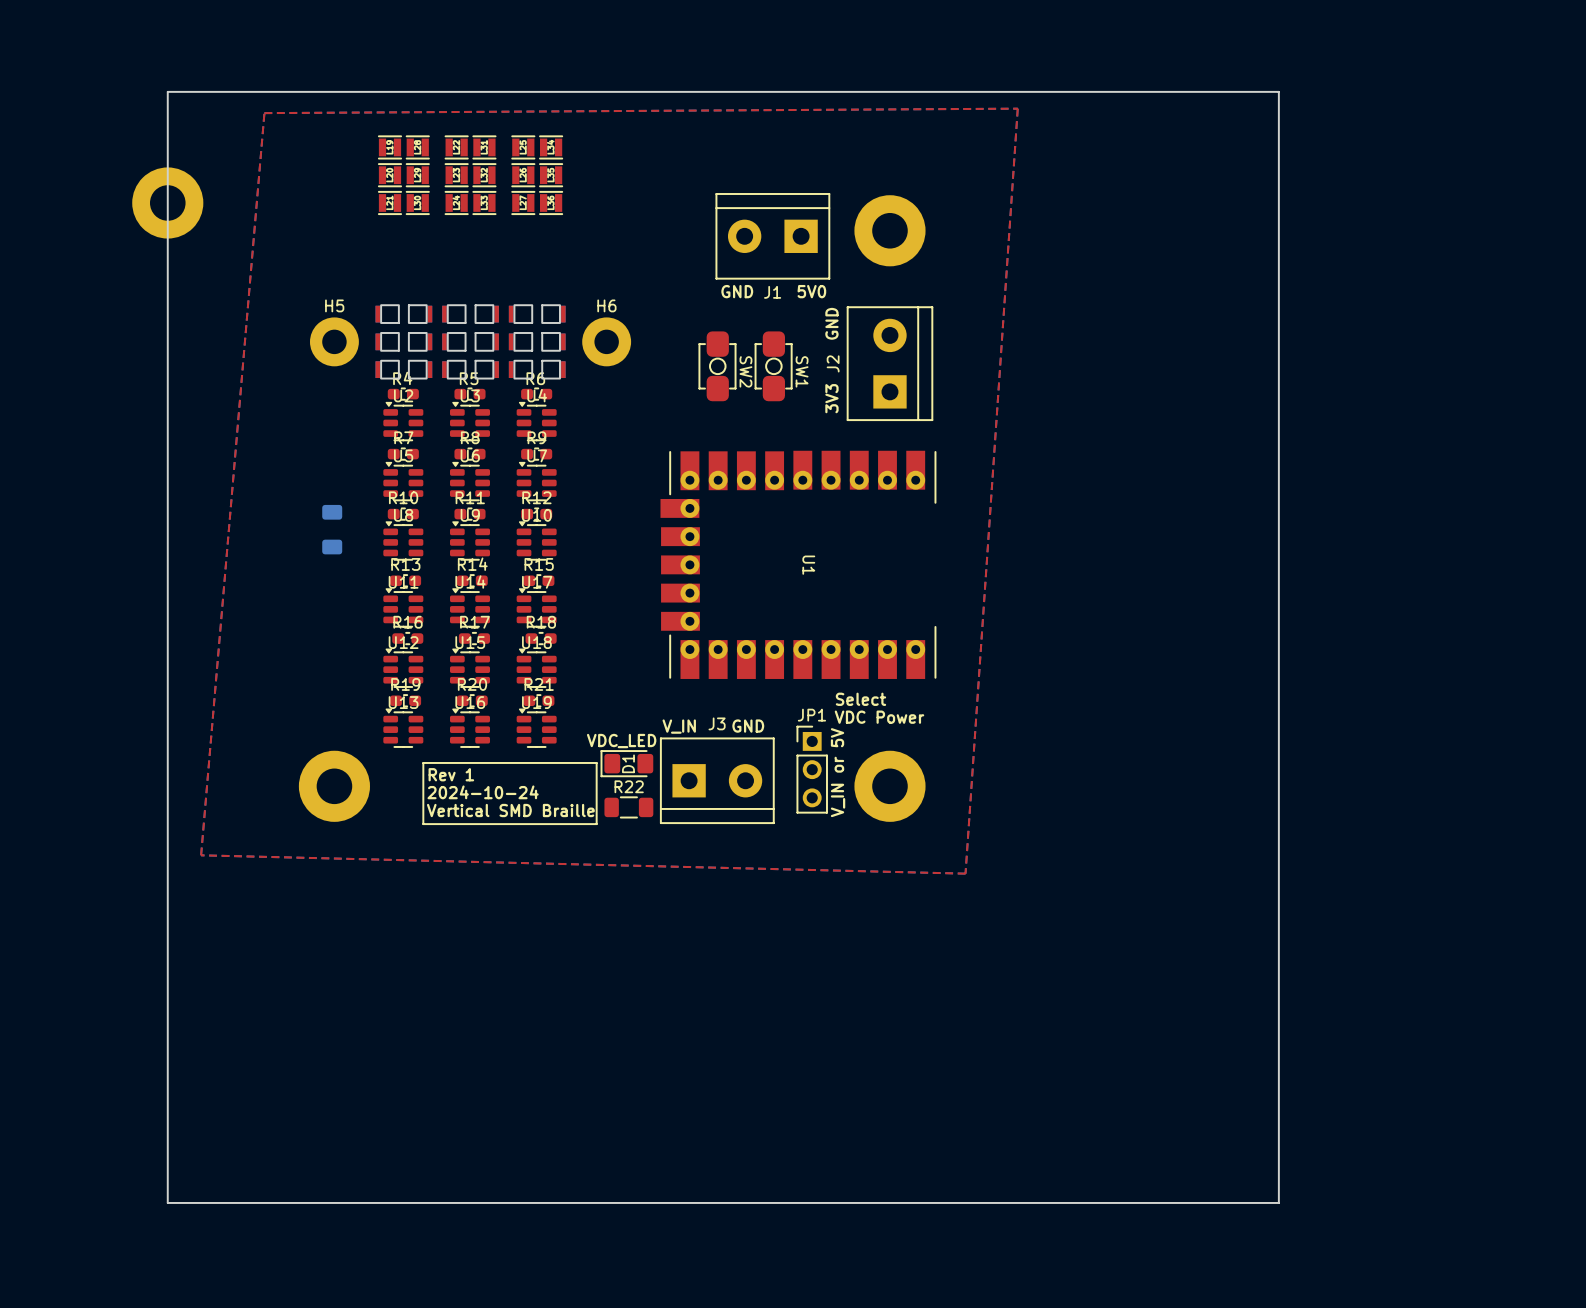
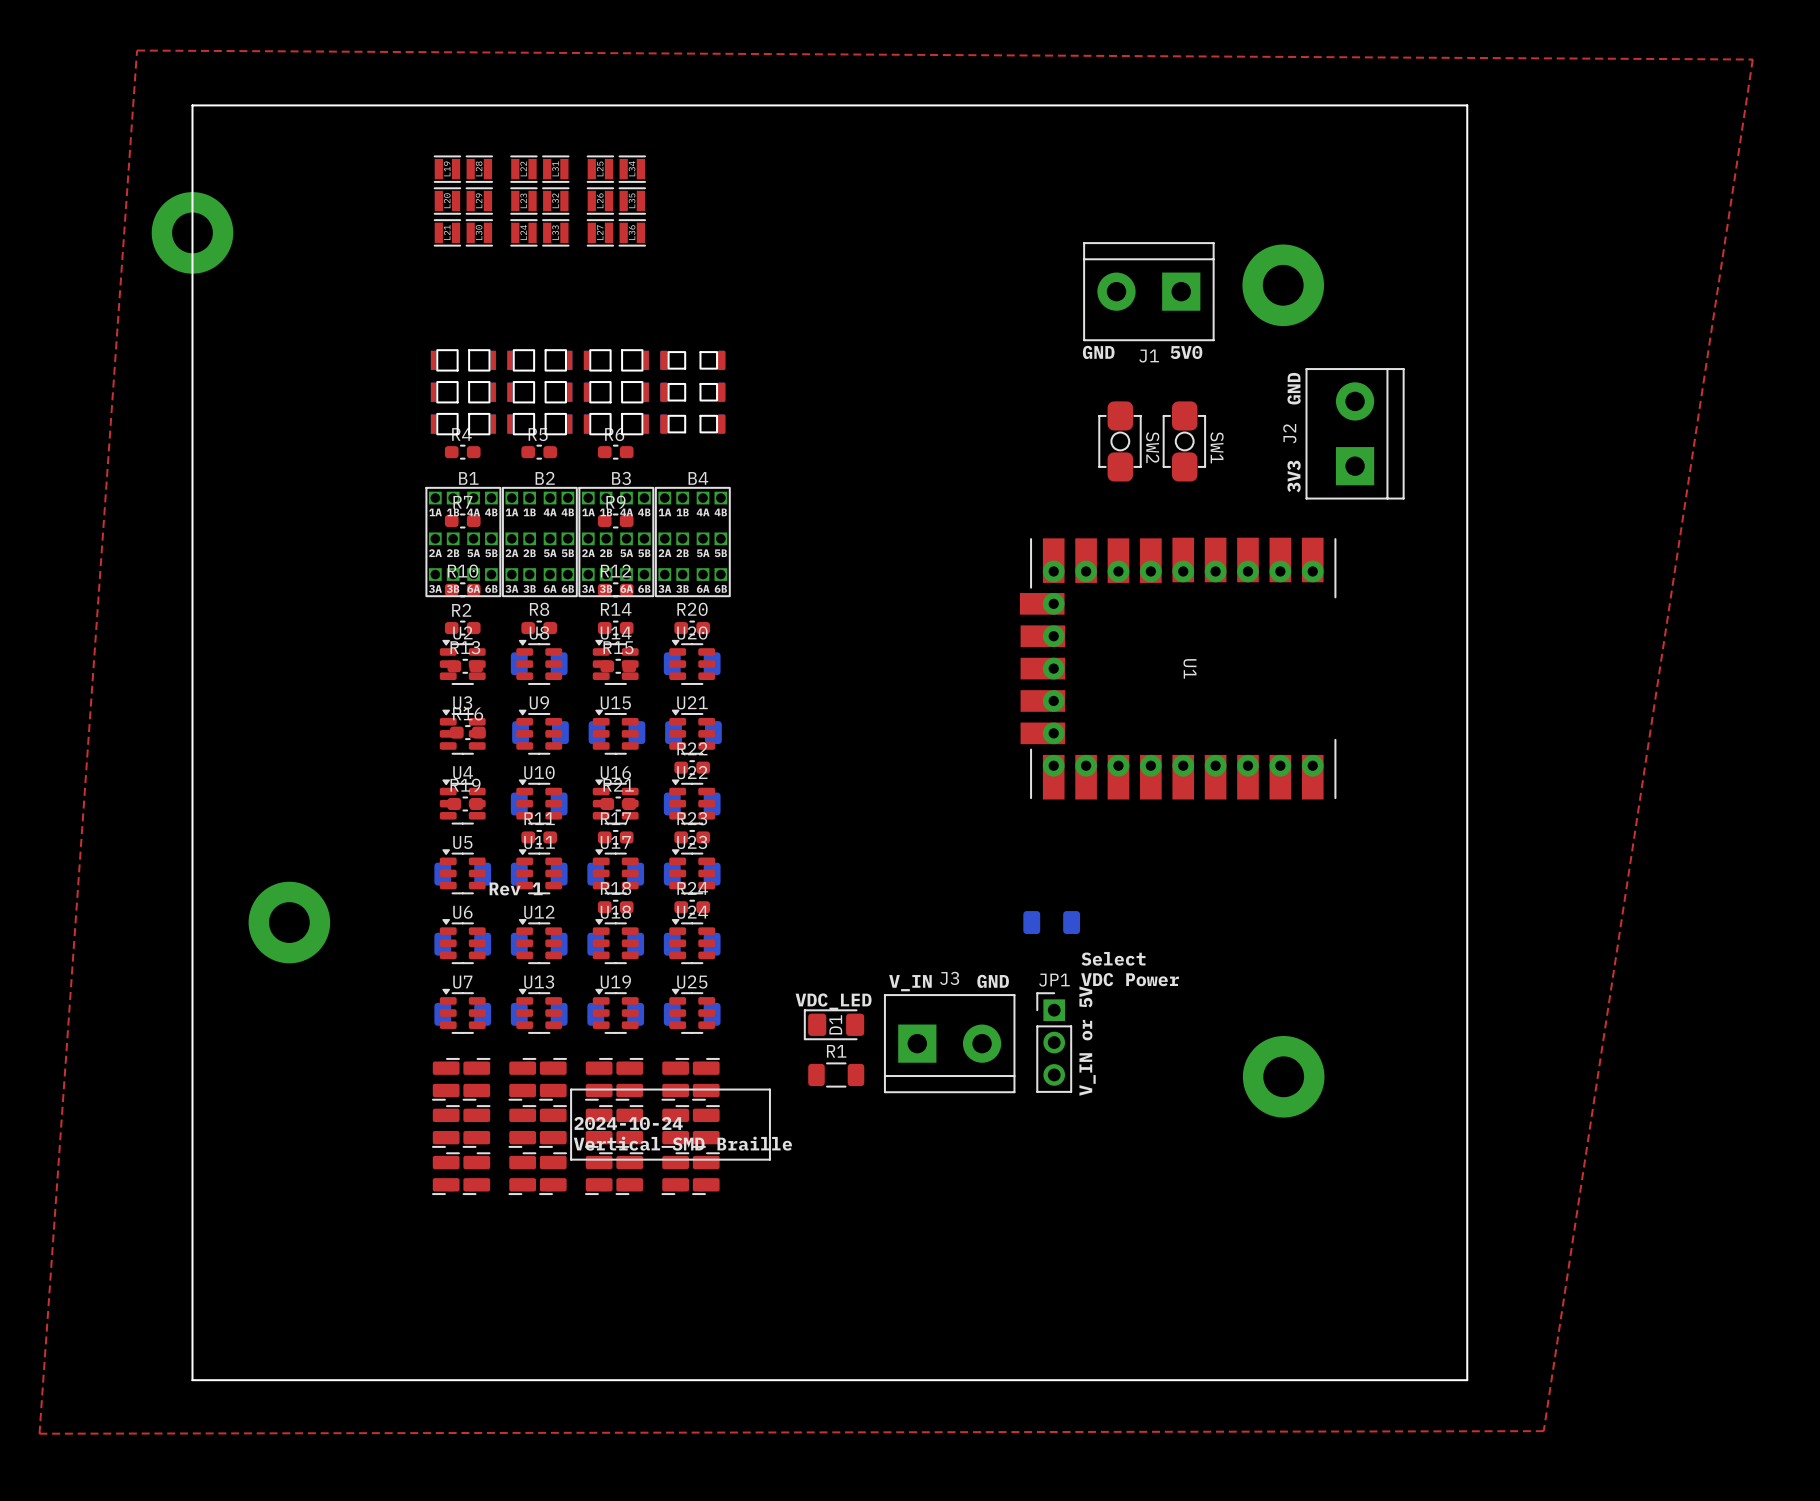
top zone outline: none -> (137, 50) (1752, 59) (1543, 1431) (39, 1433) (137, 50)
top zone outline: (1017, 108) (264, 113) (201, 855) (965, 873) (1017, 108) -> none
part position: (889, 230) -> (1283, 285)
J1 position: (772, 236) -> (1148, 291)
text position: GND 5V0 (773, 291) -> GND 5V0 (1142, 352)
part: none -> (672, 360)
part: none -> (712, 360)
H5: (334, 341) -> none
part: none -> (672, 392)
H6: (606, 341) -> none
part: none -> (712, 392)
text: 3V3 GND (831, 360) -> none
J2 position: (889, 363) -> (1355, 433)
SW2 position: (717, 366) -> (1120, 441)
SW1 position: (773, 366) -> (1184, 441)
part: none -> (672, 424)
part: none -> (712, 424)
text: none -> 3V3 GND (1294, 432)
U2 position: (403, 421) -> (462, 662)
U3 position: (469, 421) -> (462, 732)
U4 position: (536, 421) -> (462, 801)
R8 position: (469, 454) -> (539, 628)
B1: none -> (463, 542)
B2: none -> (539, 542)
B3: none -> (616, 542)
B4: none -> (692, 542)
U5 position: (403, 481) -> (462, 871)
U6 position: (469, 481) -> (462, 941)
U7 position: (536, 481) -> (462, 1011)
R11 position: (469, 514) -> (539, 837)
part: (332, 529) -> none
U8 position: (403, 540) -> (539, 662)
U9 position: (469, 540) -> (539, 732)
U10 position: (536, 540) -> (539, 801)
R2: none -> (462, 628)
U1 position: (798, 564) -> (1178, 668)
U20: none -> (692, 662)
part: none -> (539, 663)
part: none -> (692, 663)
R14 position: (472, 580) -> (615, 628)
U11 position: (403, 607) -> (539, 871)
U14 position: (469, 607) -> (615, 662)
U17 position: (536, 607) -> (615, 871)
part: none -> (540, 732)
R17 position: (474, 638) -> (615, 837)
part: none -> (616, 732)
R18 position: (541, 638) -> (615, 907)
U21: none -> (692, 732)
part: none -> (693, 732)
U12 position: (403, 668) -> (539, 941)
U15 position: (469, 668) -> (615, 732)
U18 position: (536, 668) -> (615, 941)
U22: none -> (692, 801)
text position: Select (860, 699) -> Select (1113, 958)
part: none -> (539, 803)
R20 position: (472, 700) -> (692, 628)
part: none -> (692, 803)
text position: VDC Power (879, 717) -> VDC Power (1130, 979)
text position: V_IN GND (713, 726) -> V_IN GND (949, 983)
U13 position: (403, 728) -> (539, 1011)
U16 position: (469, 728) -> (615, 801)
U19 position: (536, 728) -> (615, 1011)
R23: none -> (692, 837)
text position: VDC_LED (621, 741) -> VDC_LED (833, 1001)
U23: none -> (692, 871)
part: none -> (462, 874)
part: none -> (539, 874)
part: none -> (615, 874)
part: none -> (692, 874)
line: (423, 762) (596, 762) (596, 824) (423, 824) (423, 762) -> (571, 1089) (769, 1089) (769, 1159) (571, 1159) (571, 1089)
D1 position: (627, 763) -> (834, 1024)
JP1 position: (812, 769) -> (1054, 1042)
text position: V_IN or 5V (838, 772) -> V_IN or 5V (1087, 1041)
J3 position: (717, 780) -> (949, 1043)
part position: (334, 786) -> (289, 922)
part position: (889, 786) -> (1283, 1076)
R24: none -> (692, 907)
text position: 2024-10-24 (483, 792) -> 2024-10-24 (628, 1123)
R22 footprint: [604, 796, 654, 819] -> [674, 760, 711, 775]
part: none -> (1051, 922)
text position: Vertical SMD Braille (510, 810) -> Vertical SMD Braille (682, 1143)
U24: none -> (692, 941)
part: none -> (462, 944)
part: none -> (539, 944)
part: none -> (615, 944)
part: none -> (692, 944)
U25: none -> (692, 1011)
part: none -> (462, 1014)
part: none -> (539, 1014)
part: none -> (615, 1014)
part: none -> (692, 1014)
R1: none -> (836, 1075)
part: none -> (445, 1079)
part: none -> (476, 1079)
part: none -> (522, 1079)
part: none -> (553, 1079)
part: none -> (598, 1079)
part: none -> (629, 1079)
part: none -> (675, 1079)
part: none -> (705, 1079)
part: none -> (445, 1126)
part: none -> (476, 1126)
part: none -> (522, 1126)
part: none -> (553, 1126)
part: none -> (598, 1126)
part: none -> (629, 1126)
part: none -> (675, 1126)
part: none -> (705, 1126)
part: none -> (445, 1173)
part: none -> (476, 1173)
part: none -> (522, 1173)
part: none -> (553, 1173)
part: none -> (598, 1173)
part: none -> (629, 1173)
part: none -> (675, 1173)
part: none -> (705, 1173)

